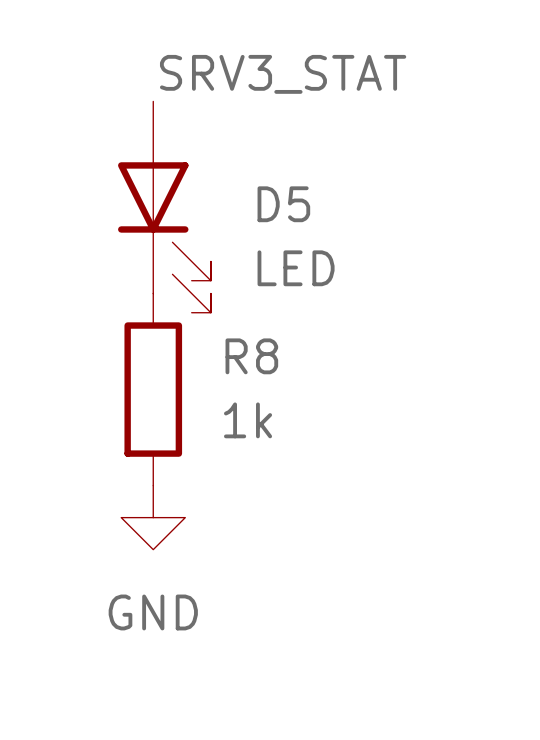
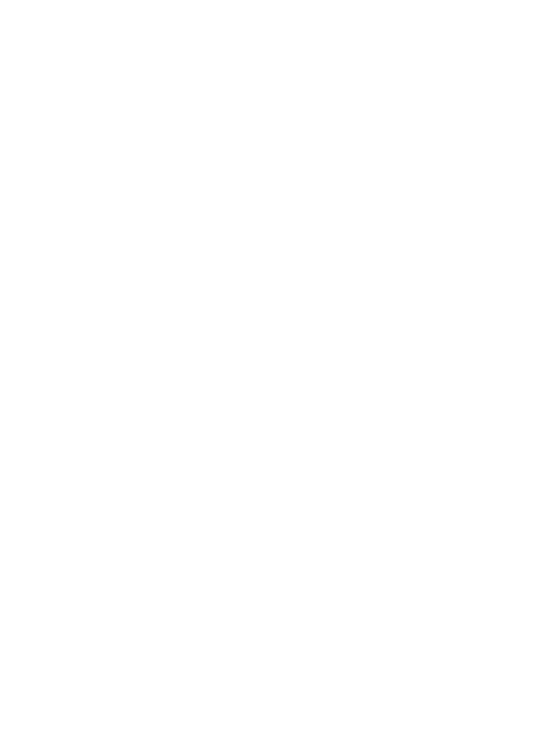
label: SRV3_STAT (283, 74) -> none
D5: LED (164, 207) -> none
R8: 1k (153, 389) -> none
power symbol: GND (153, 517) -> none

